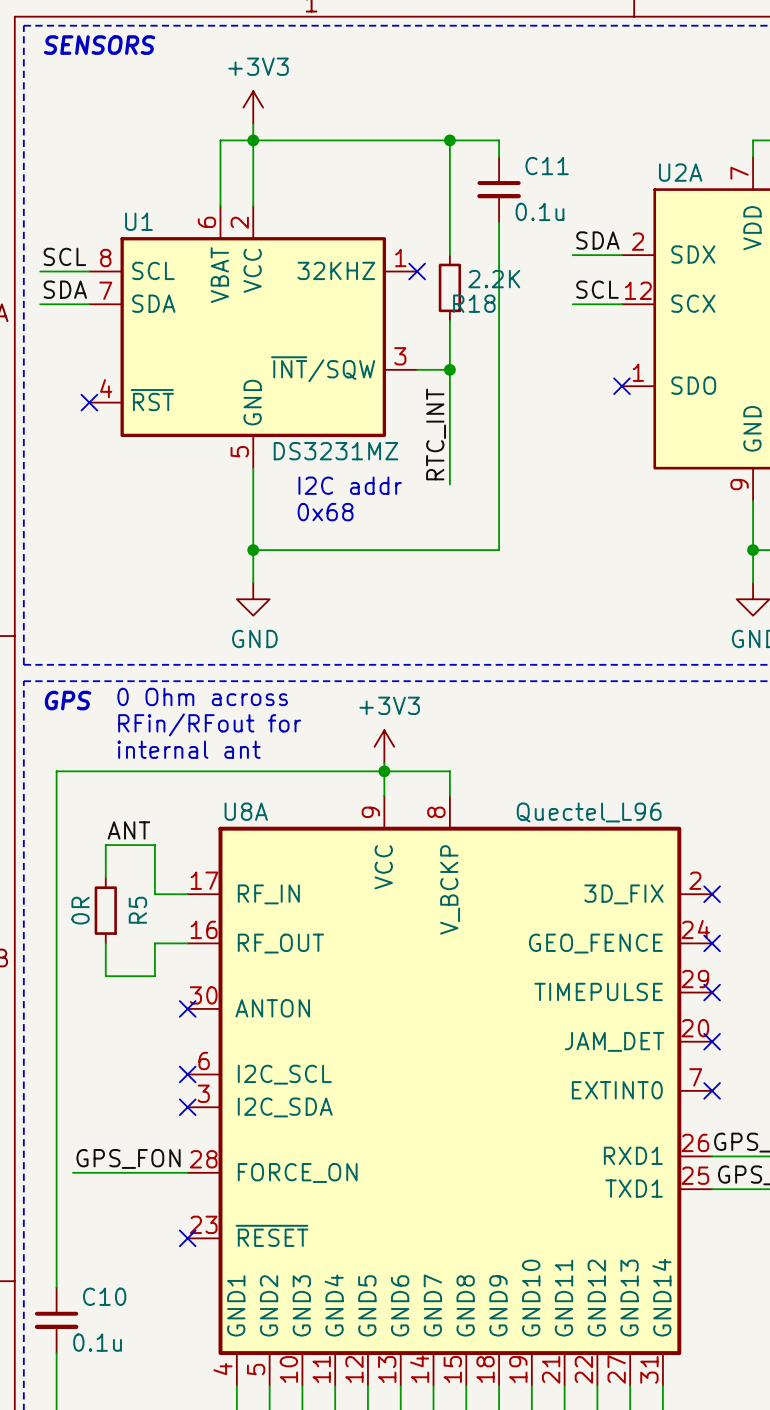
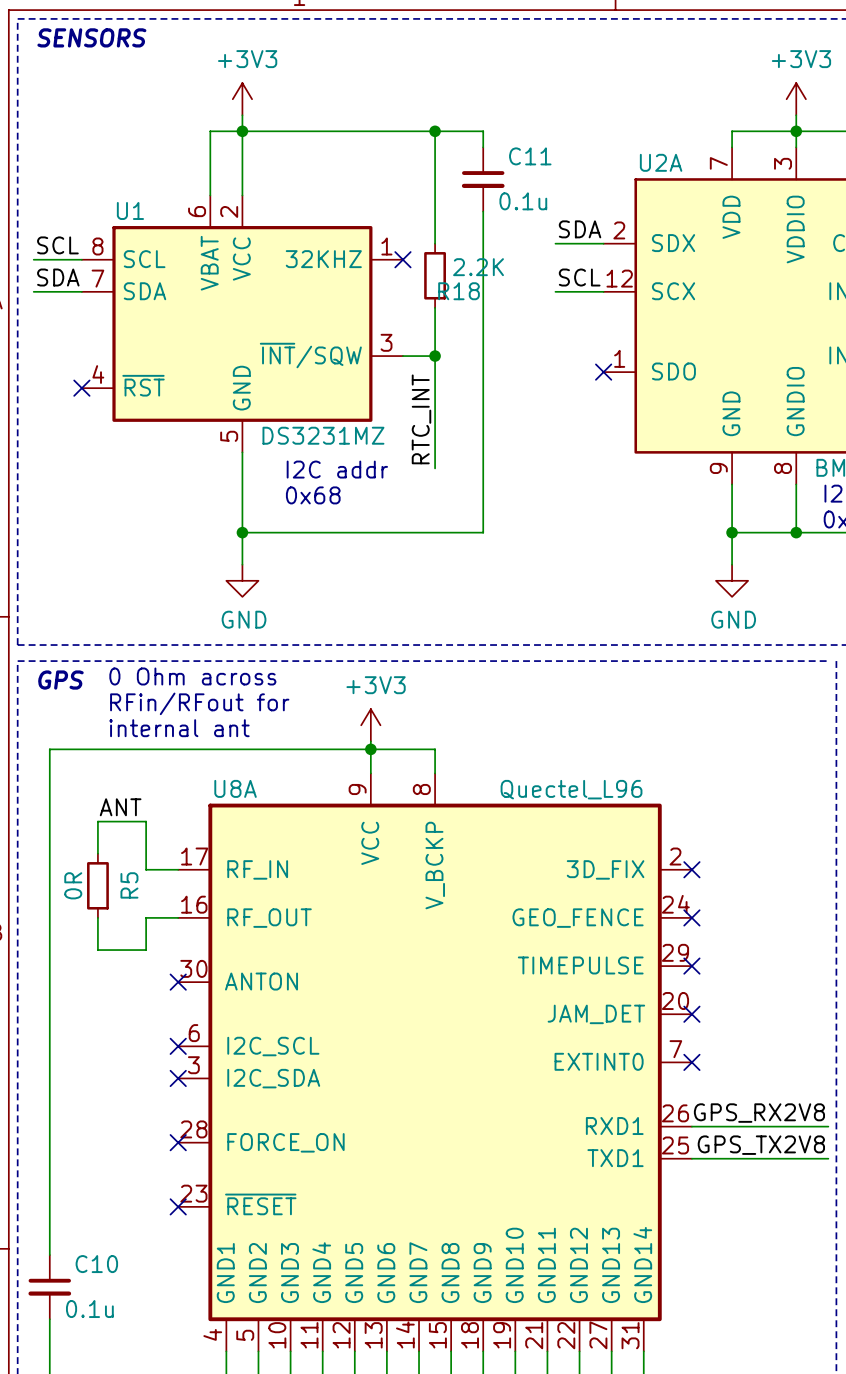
label: GPS_FON (128, 1158) -> none
wire: (73, 1172) (187, 1172) -> none
no-connect mark: none -> (178, 1142)

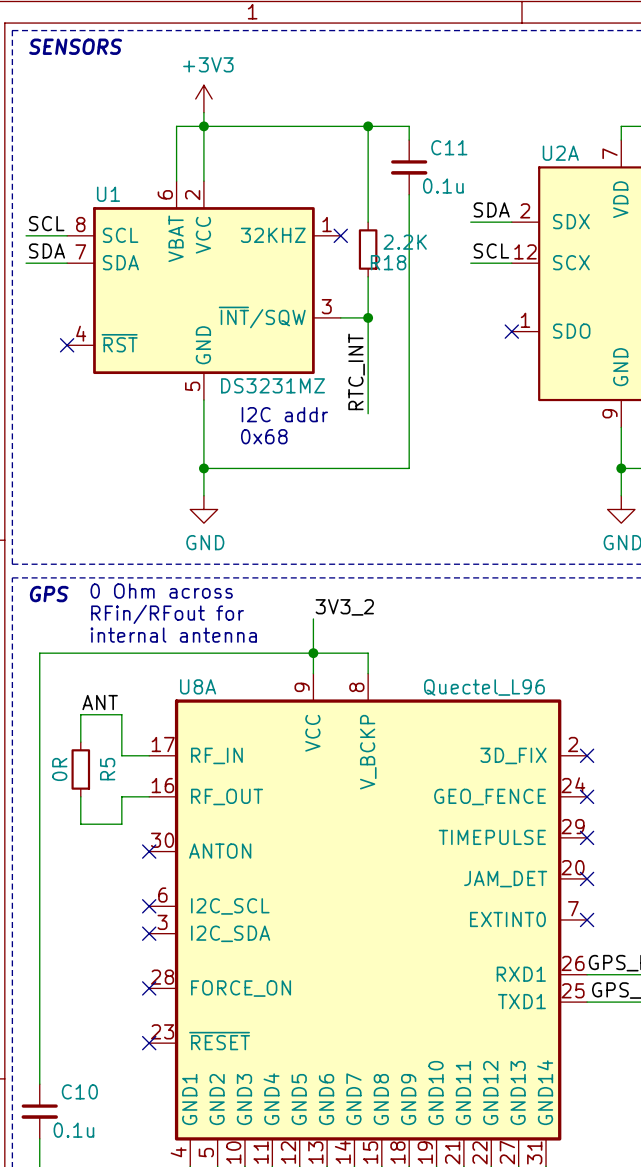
label: none -> 3V3_2 (344, 607)
power symbol: +3V3 (370, 725) -> none
text: internal ant (179, 728) -> internal antenna (173, 635)

